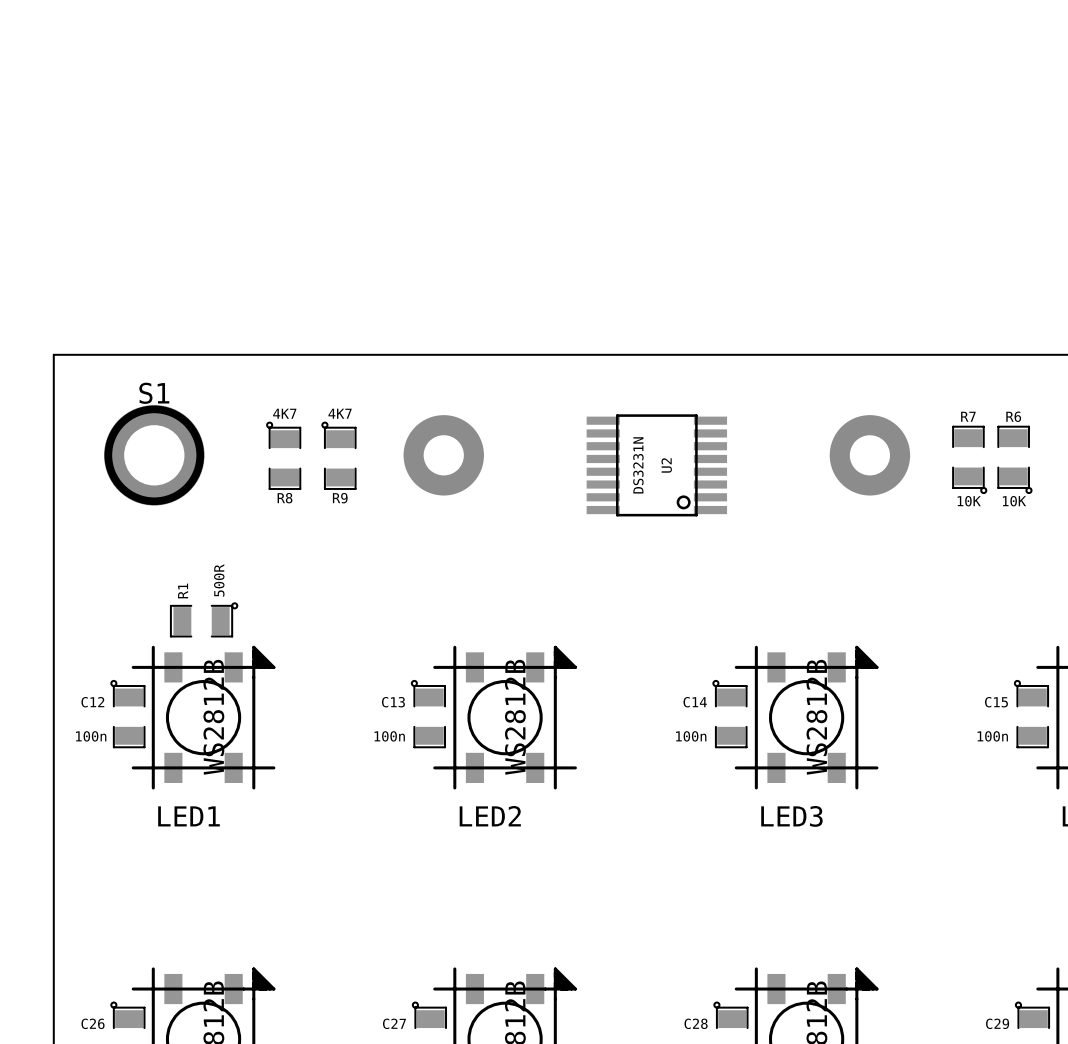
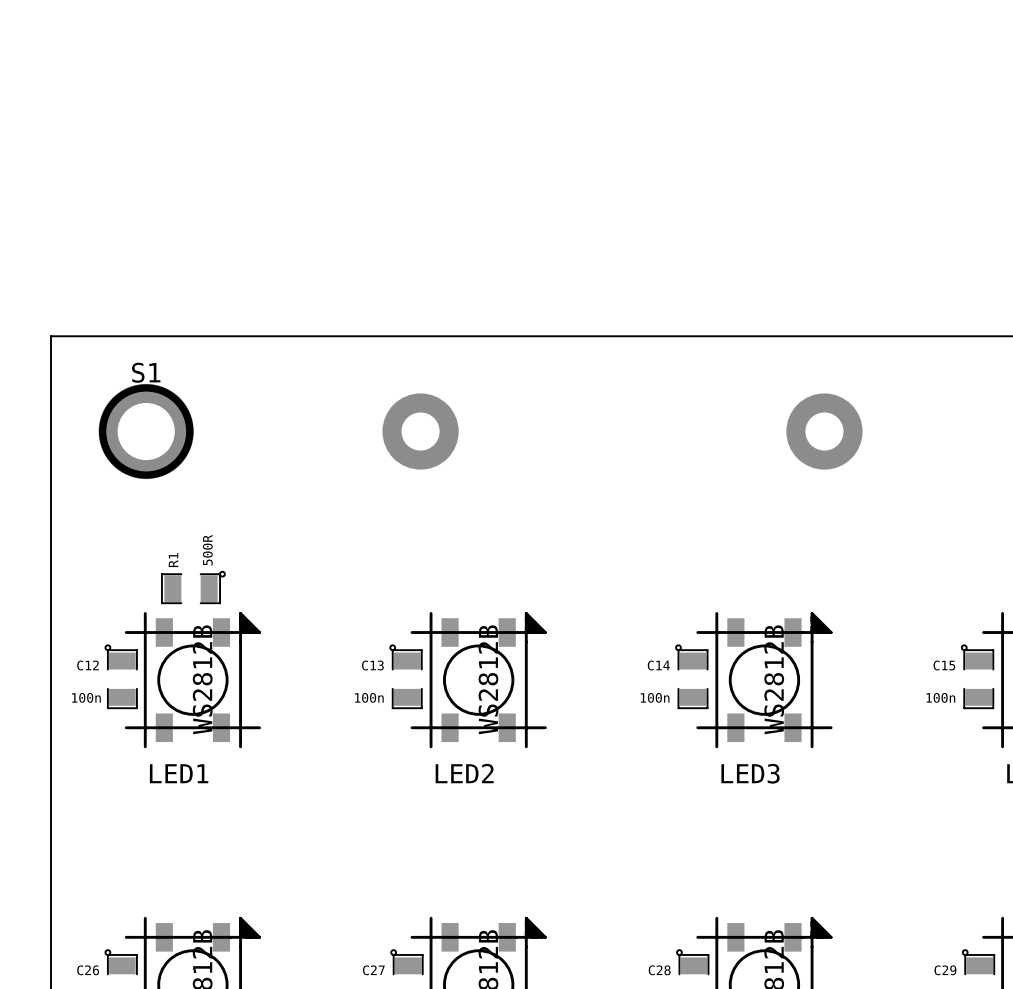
R8: 4K7 (283, 455) -> none
R9: 4K7 (338, 455) -> none
R7: 10K (969, 459) -> none
R6: 10K (1014, 459) -> none
U2: DS3231N (656, 465) -> none

